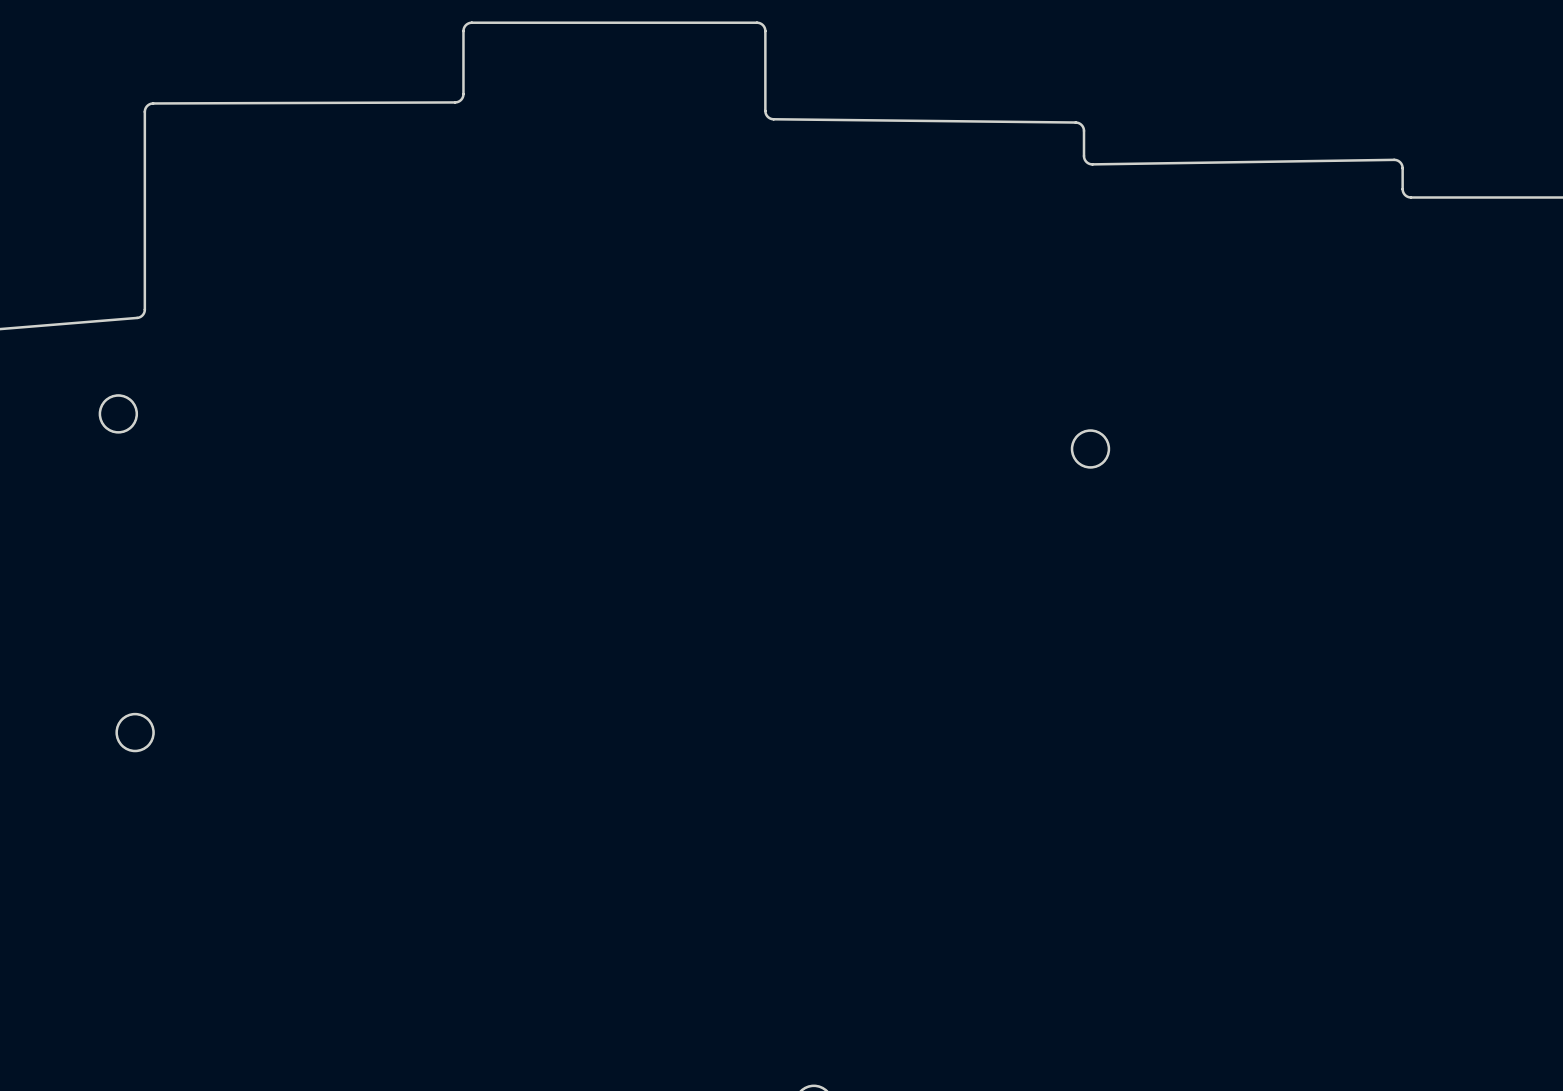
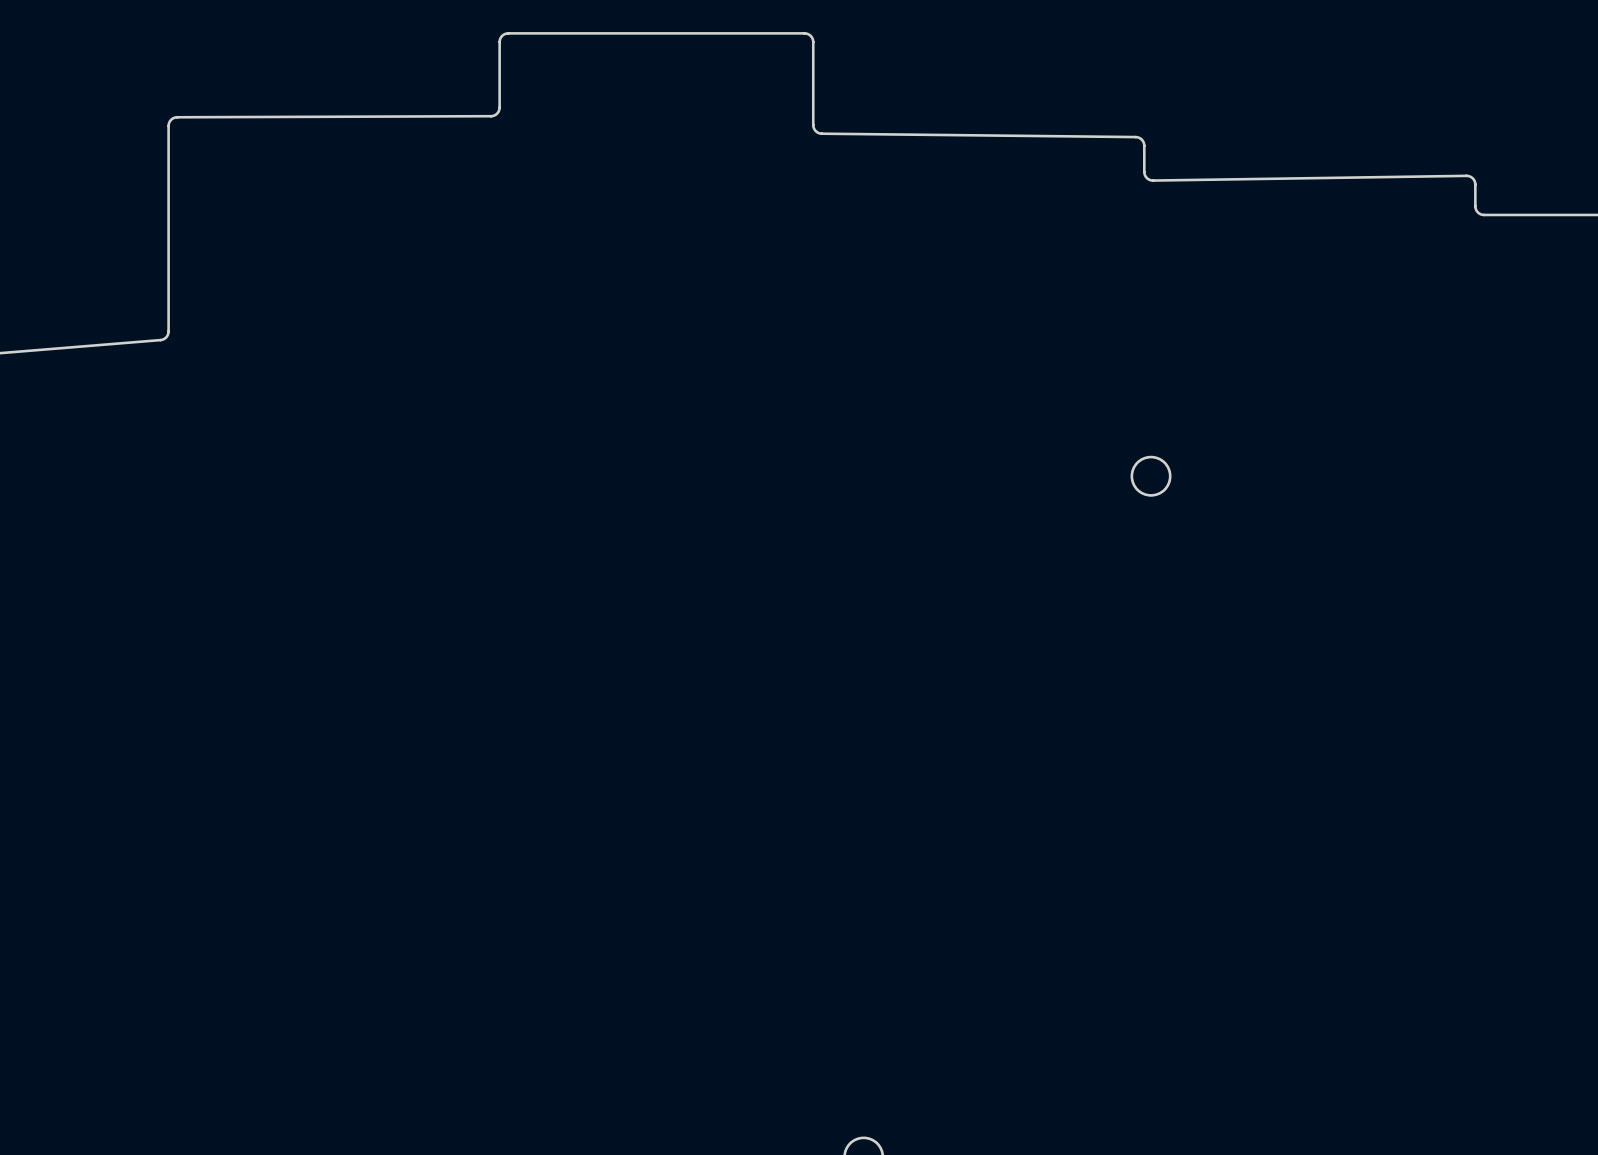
round board edge: [98, 394, 139, 434] -> none
round board edge: [115, 712, 155, 753] -> none

